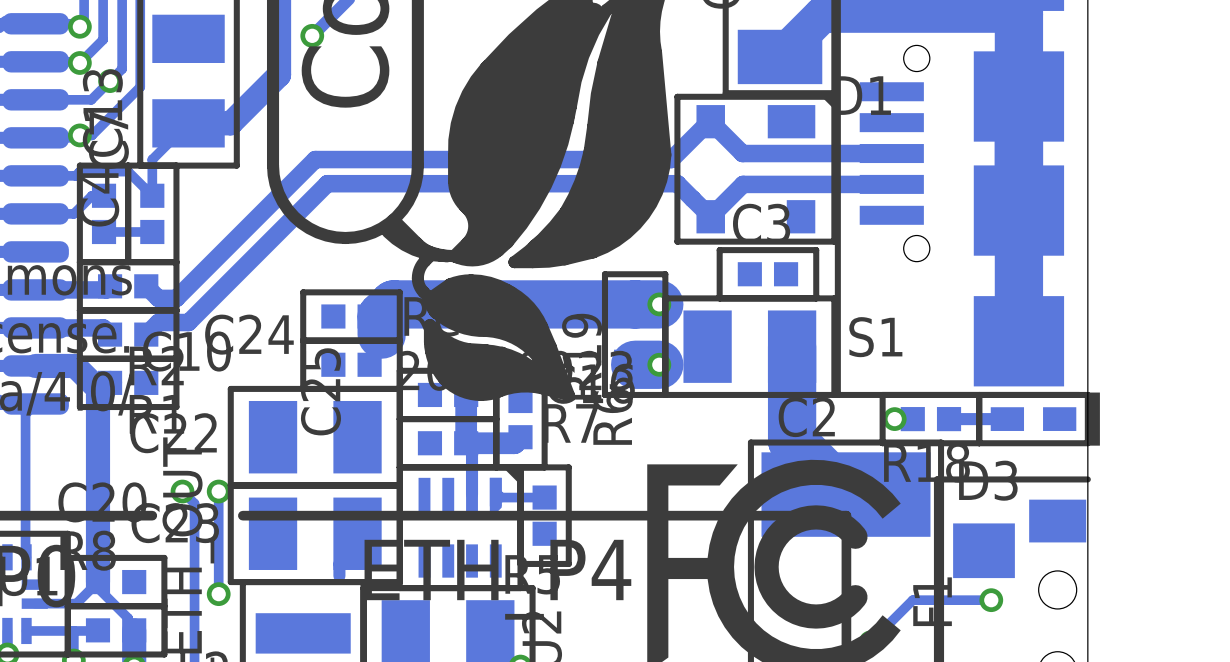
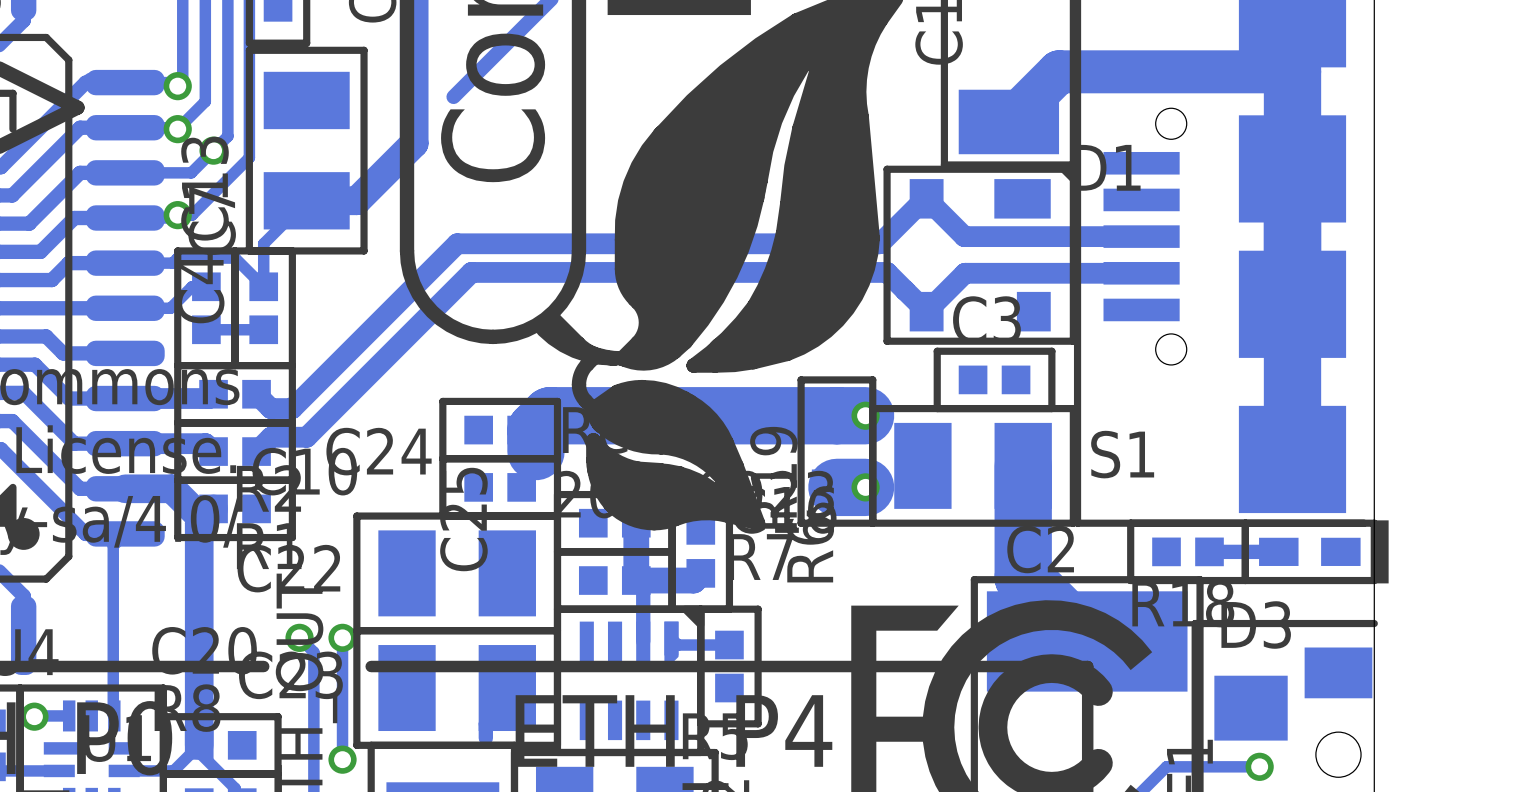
via: (312, 35) -> none
via: (894, 419) -> none

